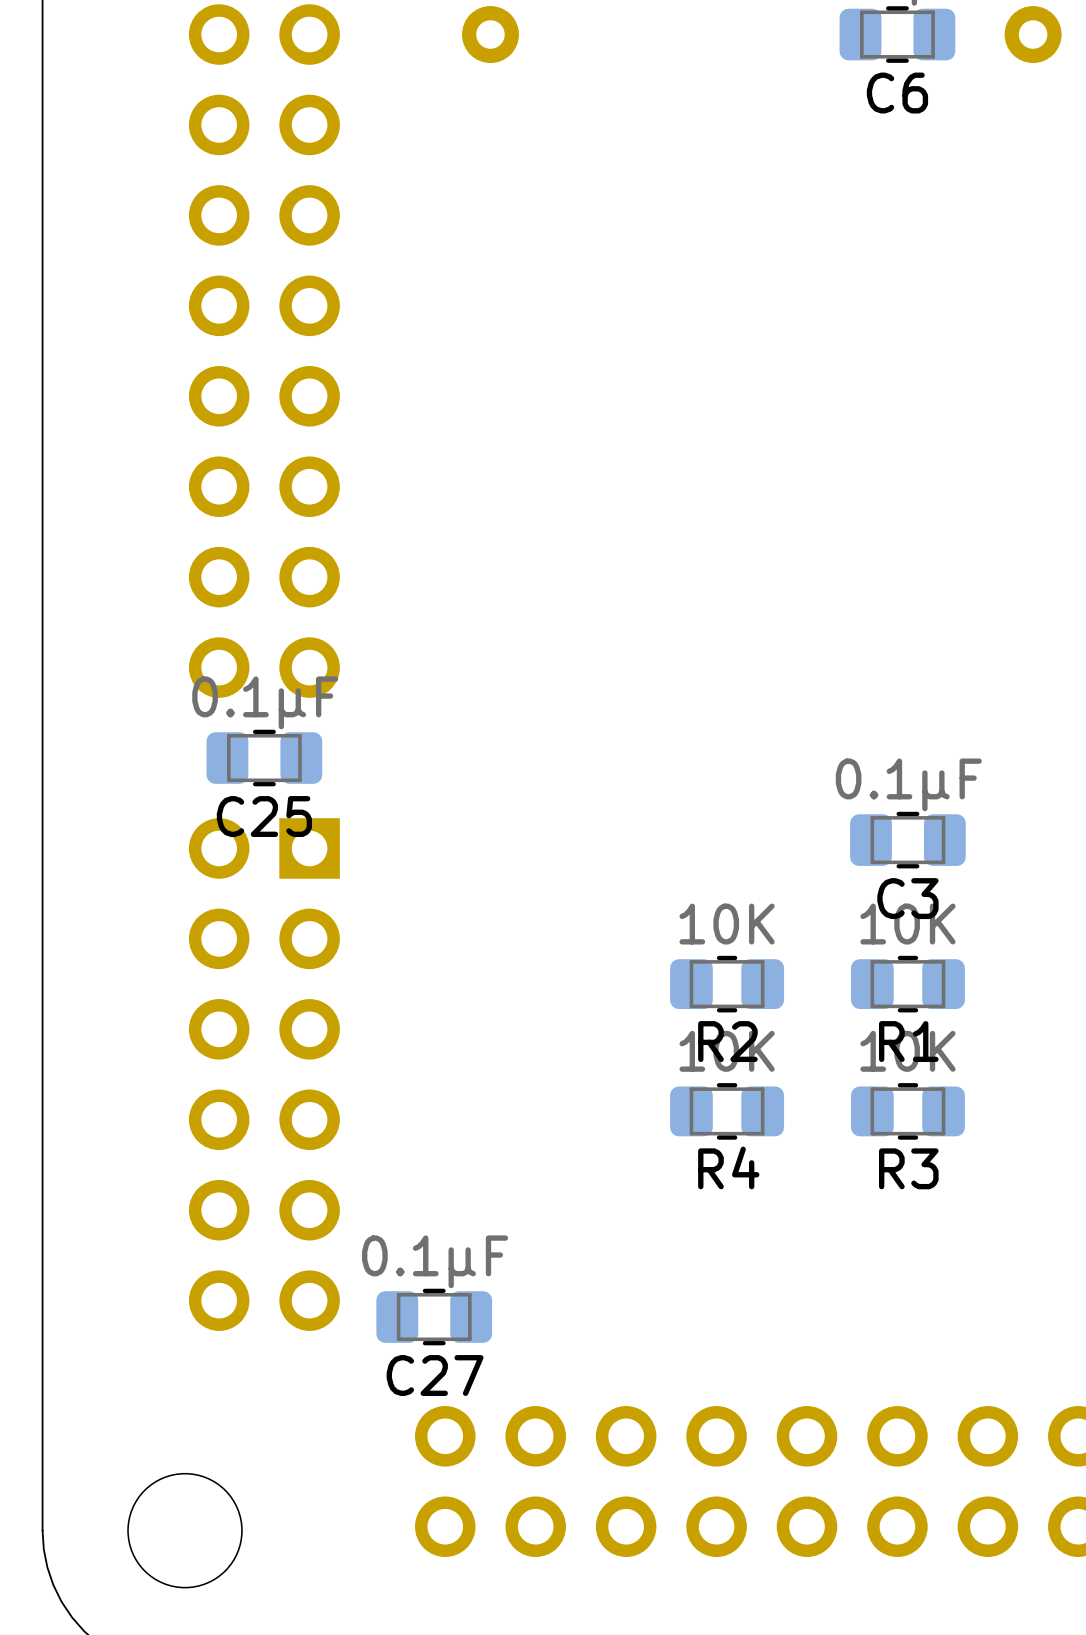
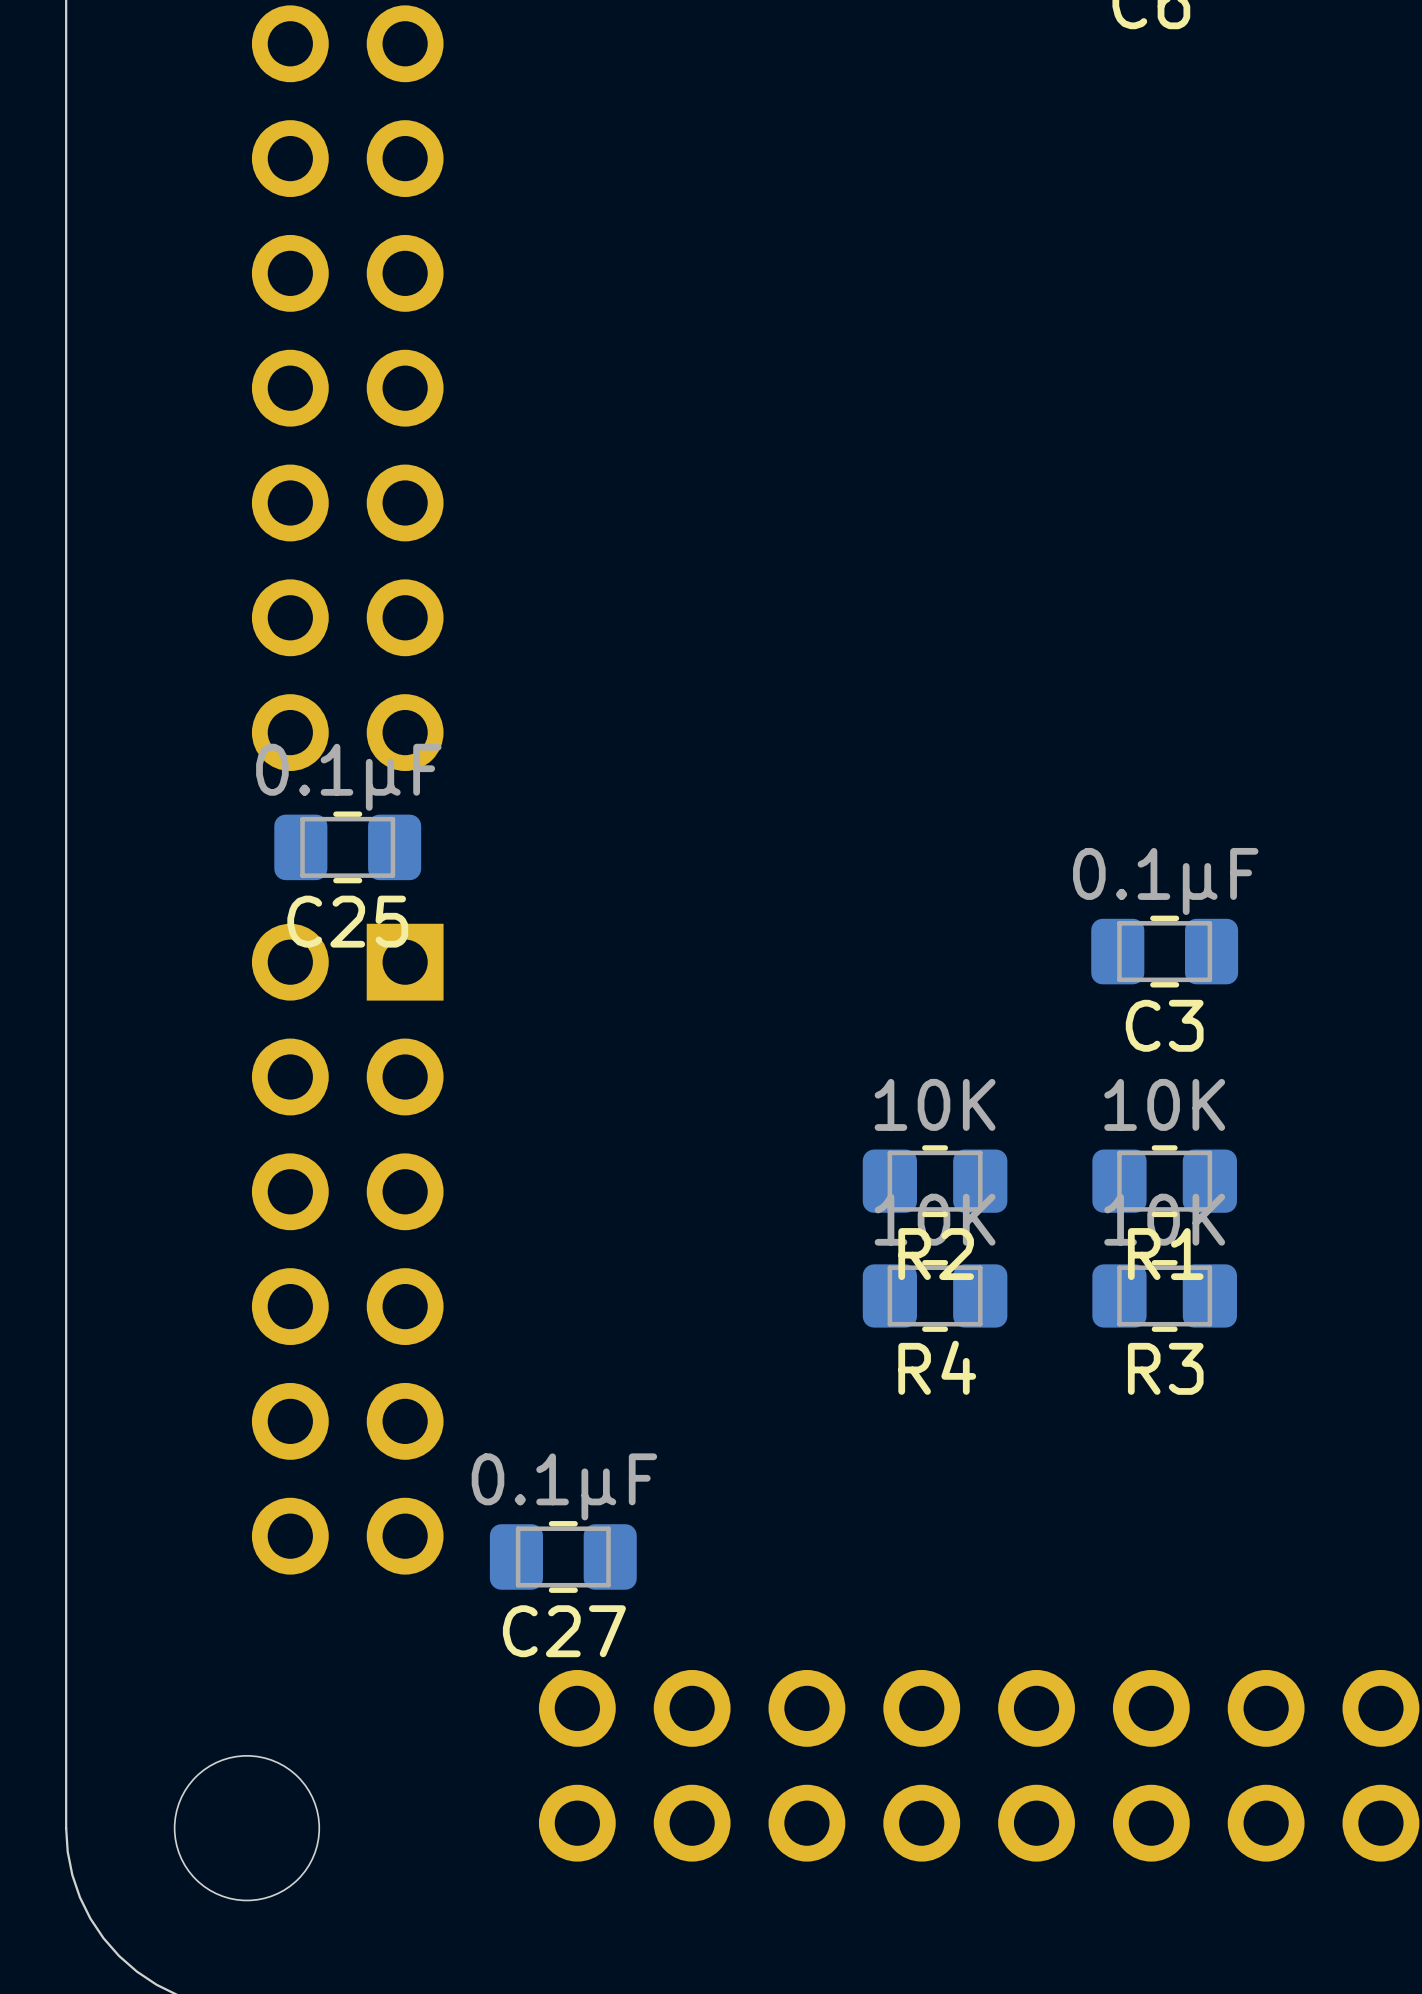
R2 position: (727, 984) -> (935, 1181)
R1 position: (907, 984) -> (1164, 1181)

